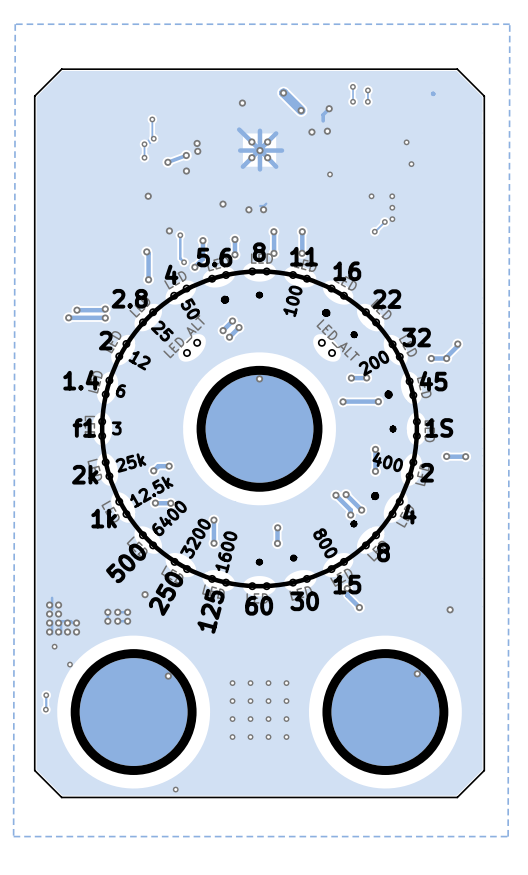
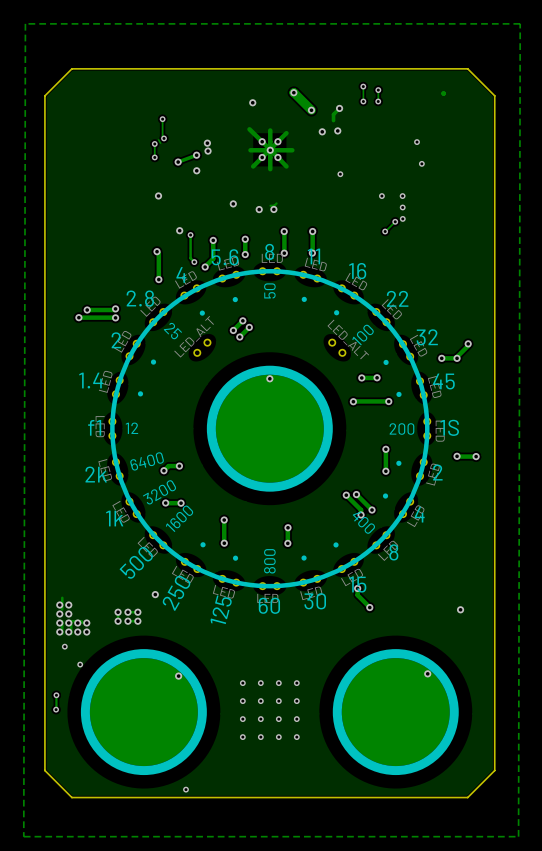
text rotation: 0° (259, 295) -> 15° clockwise (304, 299)
text position: • (259, 295) -> • (304, 299)
text rotation: 0° (292, 301) -> 30° clockwise (363, 335)
text position: 100 (292, 301) -> 100 (363, 335)
text rotation: 0° (190, 308) -> 150° counterclockwise (269, 290)
text position: 50 (190, 308) -> 50 (269, 290)
text: none -> • (202, 313)
text rotation: 0° (354, 334) -> 15° clockwise (386, 362)
text rotation: 0° (139, 360) -> 30° counterclockwise (131, 428)
text position: 12 (139, 360) -> 12 (131, 428)
text: none -> • (153, 362)
text rotation: 0° (373, 363) -> 30° clockwise (401, 429)
text position: 200 (373, 363) -> 200 (401, 429)
text: 6 (120, 391) -> none
text: none -> • (140, 393)
text: 3 (116, 428) -> none
text rotation: 0° (393, 429) -> 15° clockwise (398, 463)
text position: • (393, 429) -> • (398, 463)
text rotation: 0° (387, 462) -> 30° clockwise (363, 522)
text position: 400 (387, 462) -> 400 (363, 522)
text: 25k (130, 463) -> 6400 (147, 461)
text: 12.5k (151, 492) -> none
text: 6400 (169, 518) -> 1600 (179, 518)
text rotation: 0° (353, 523) -> 15° clockwise (336, 544)
text rotation: 0° (195, 538) -> 30° clockwise (159, 492)
text position: 3200 (195, 538) -> 3200 (159, 492)
text rotation: 0° (325, 543) -> 150° counterclockwise (269, 561)
text position: 800 (325, 543) -> 800 (269, 561)
text: none -> • (203, 544)
text: 1600 (226, 552) -> • (235, 558)
text: • (259, 562) -> none

